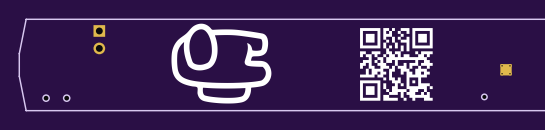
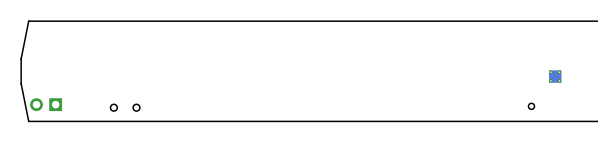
drawing: [171, 23, 272, 104] -> none
drawing: [360, 28, 433, 101] -> none
part rotation: 0° (99, 39) -> 90° clockwise (46, 104)
part position: (99, 39) -> (46, 104)
part position: (56, 98) -> (125, 107)

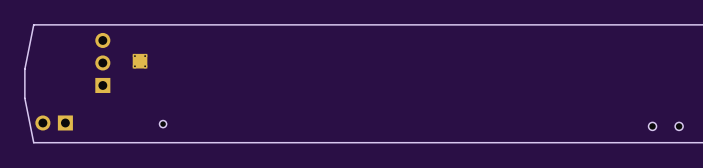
part: none -> (140, 61)
part: none -> (102, 62)
part: (555, 76) -> none
part: none -> (163, 124)
part: (531, 106) -> none
part: (125, 107) -> none
part: none -> (665, 126)

